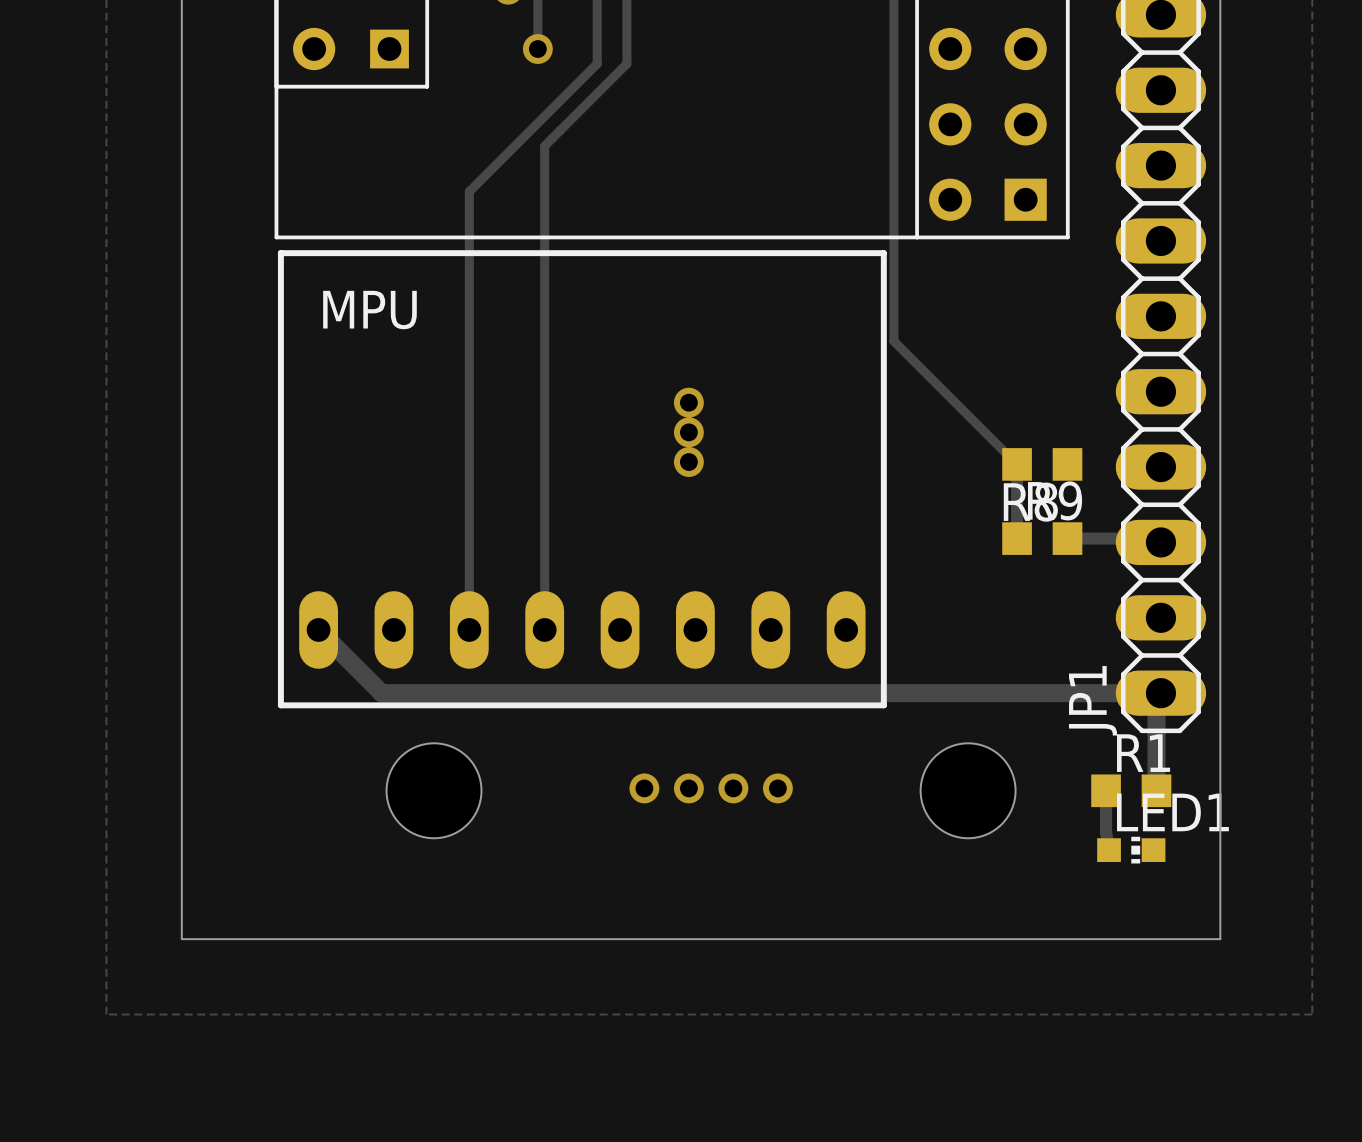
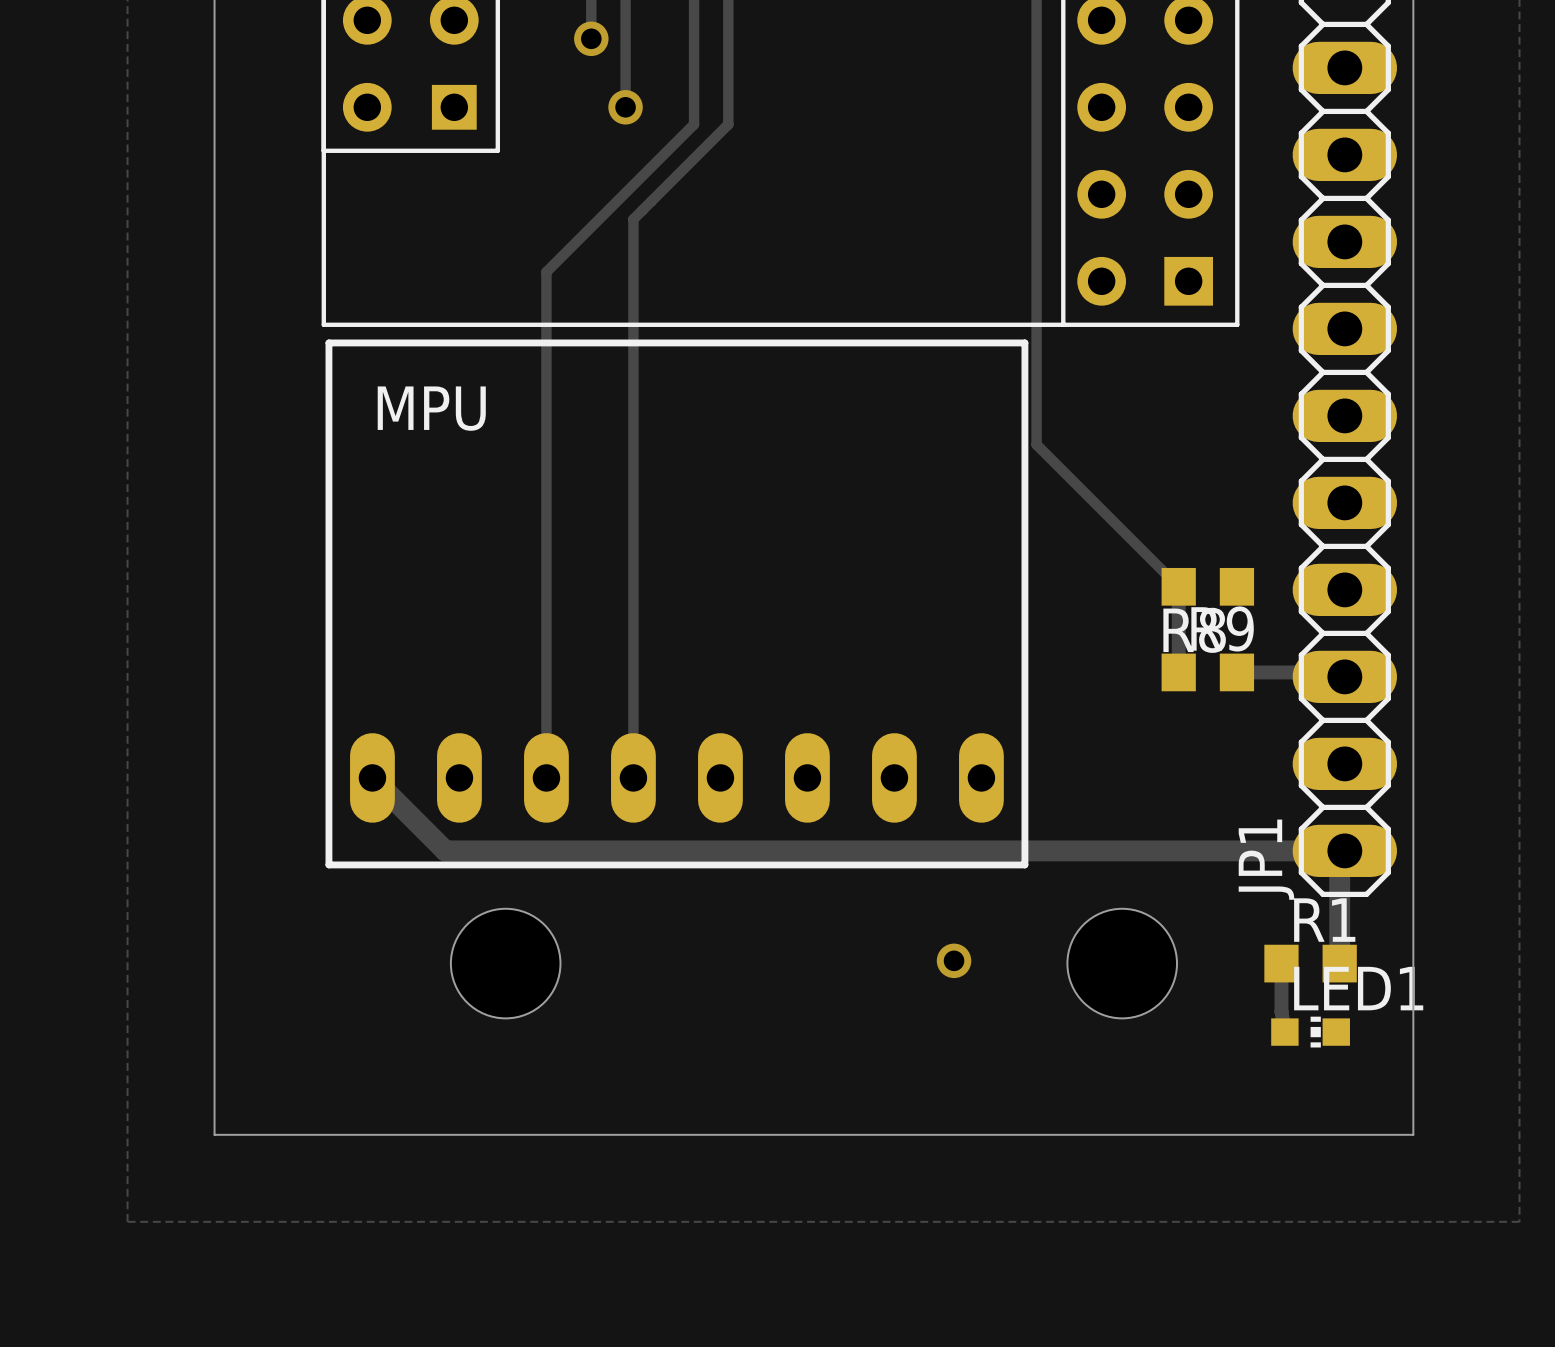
via: (688, 402) -> none
via: (688, 432) -> none
via: (688, 462) -> none
via: (644, 788) -> none
via: (688, 788) -> none
via: (733, 788) -> none
via: (777, 788) -> none
via: none -> (954, 960)

